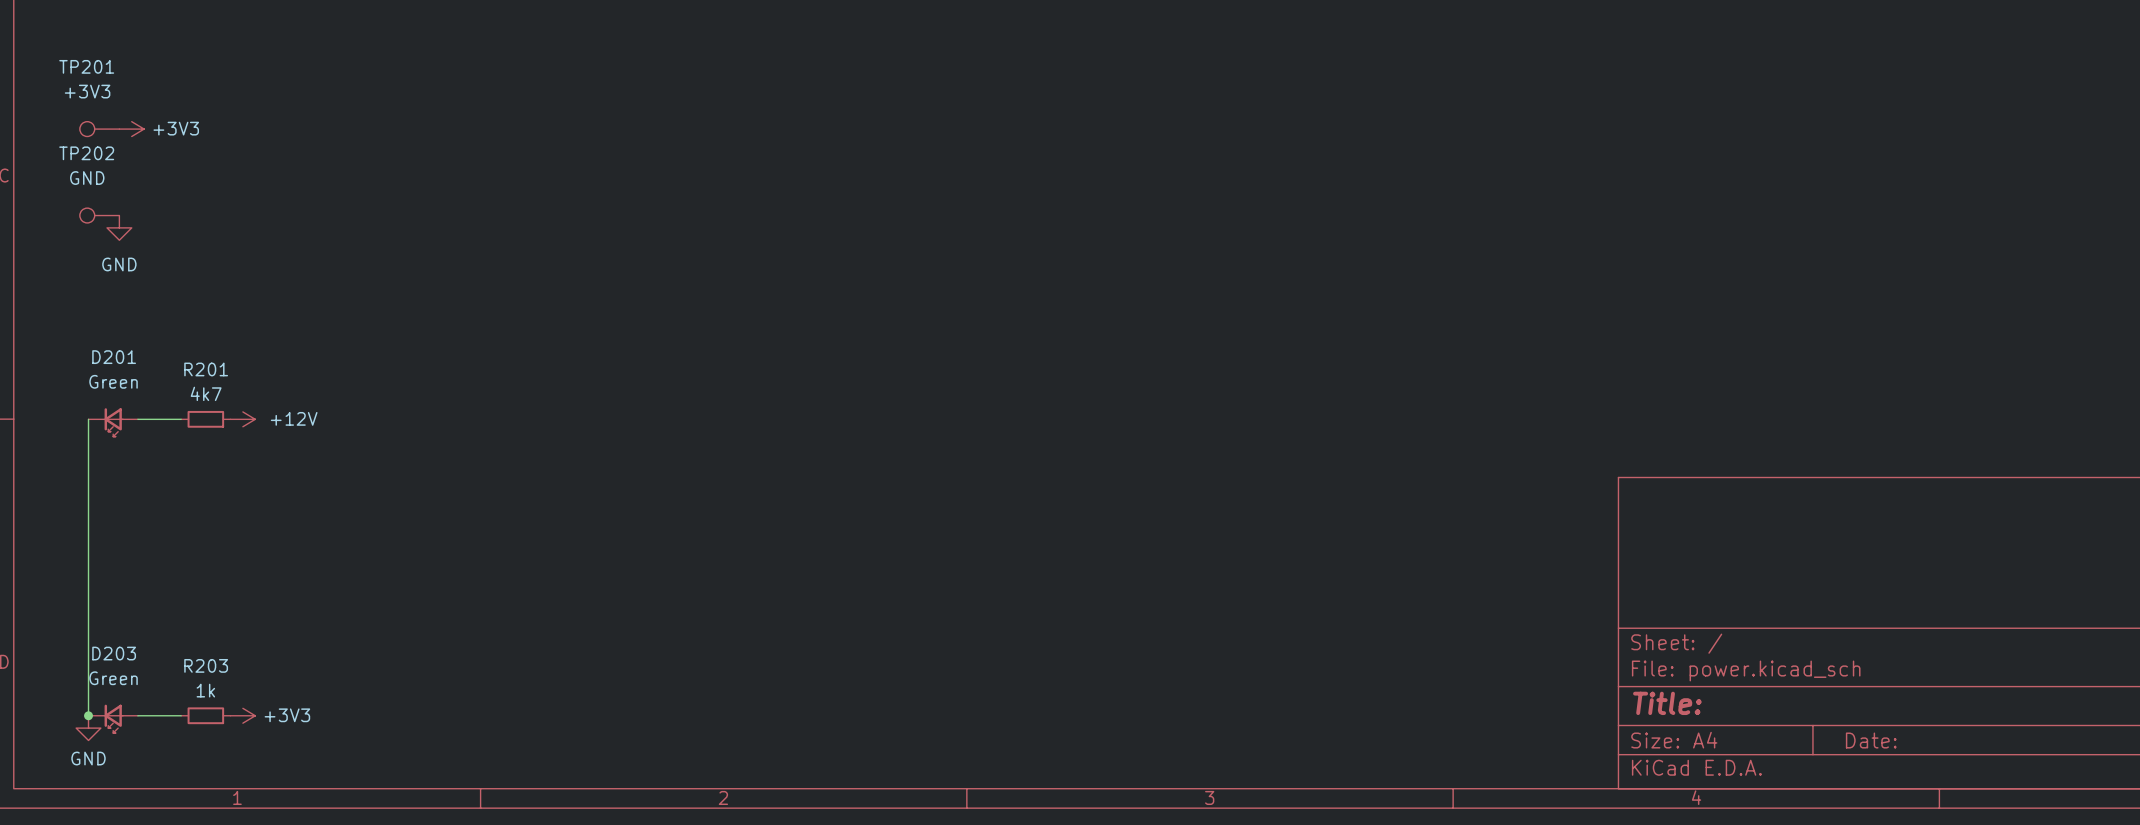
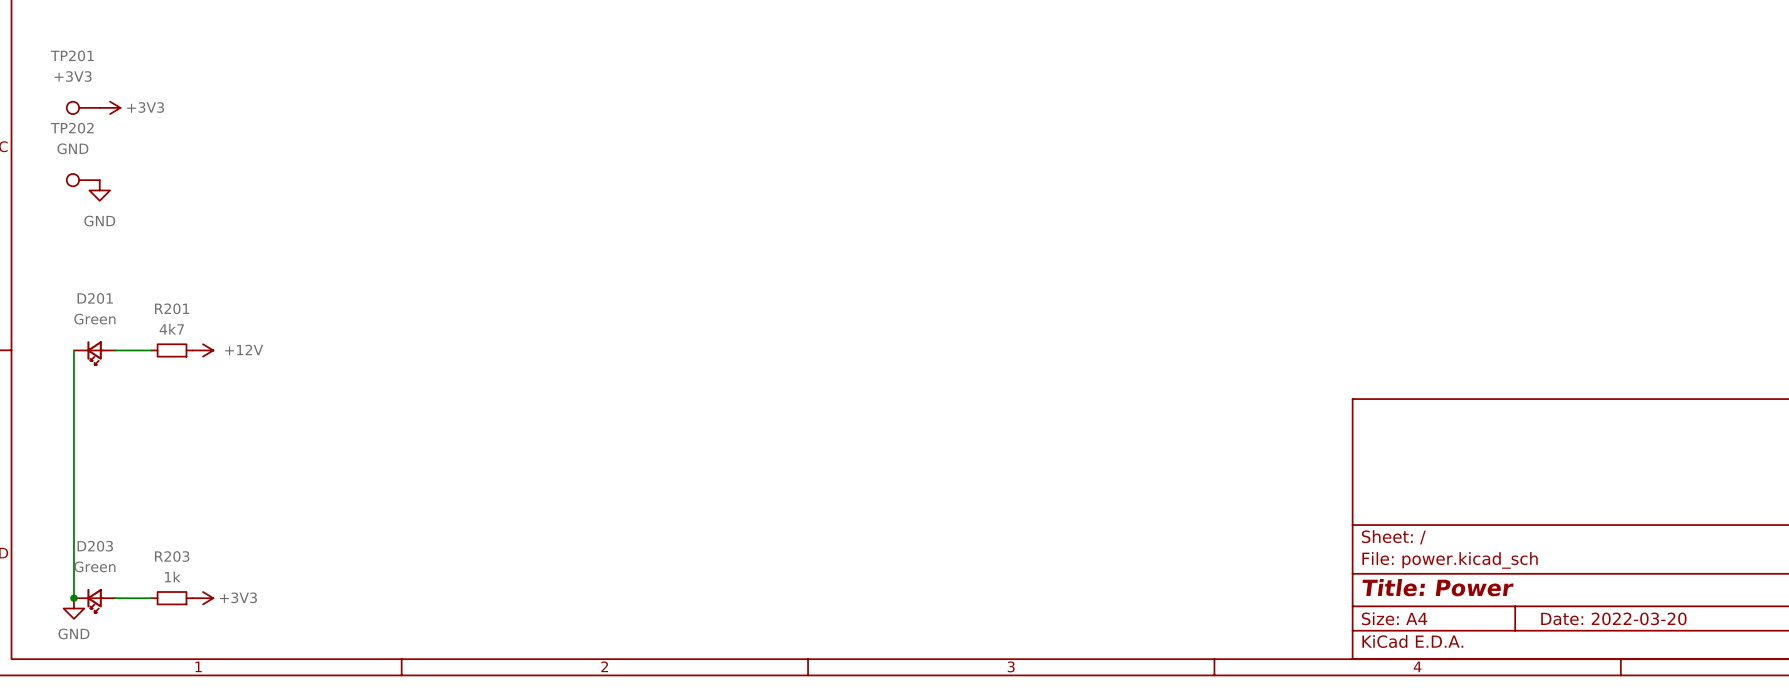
title block: Title: (1667, 703) -> Title: Power (1438, 587)
title block: Date: (1871, 740) -> Date: 2022-03-20 (1613, 618)

